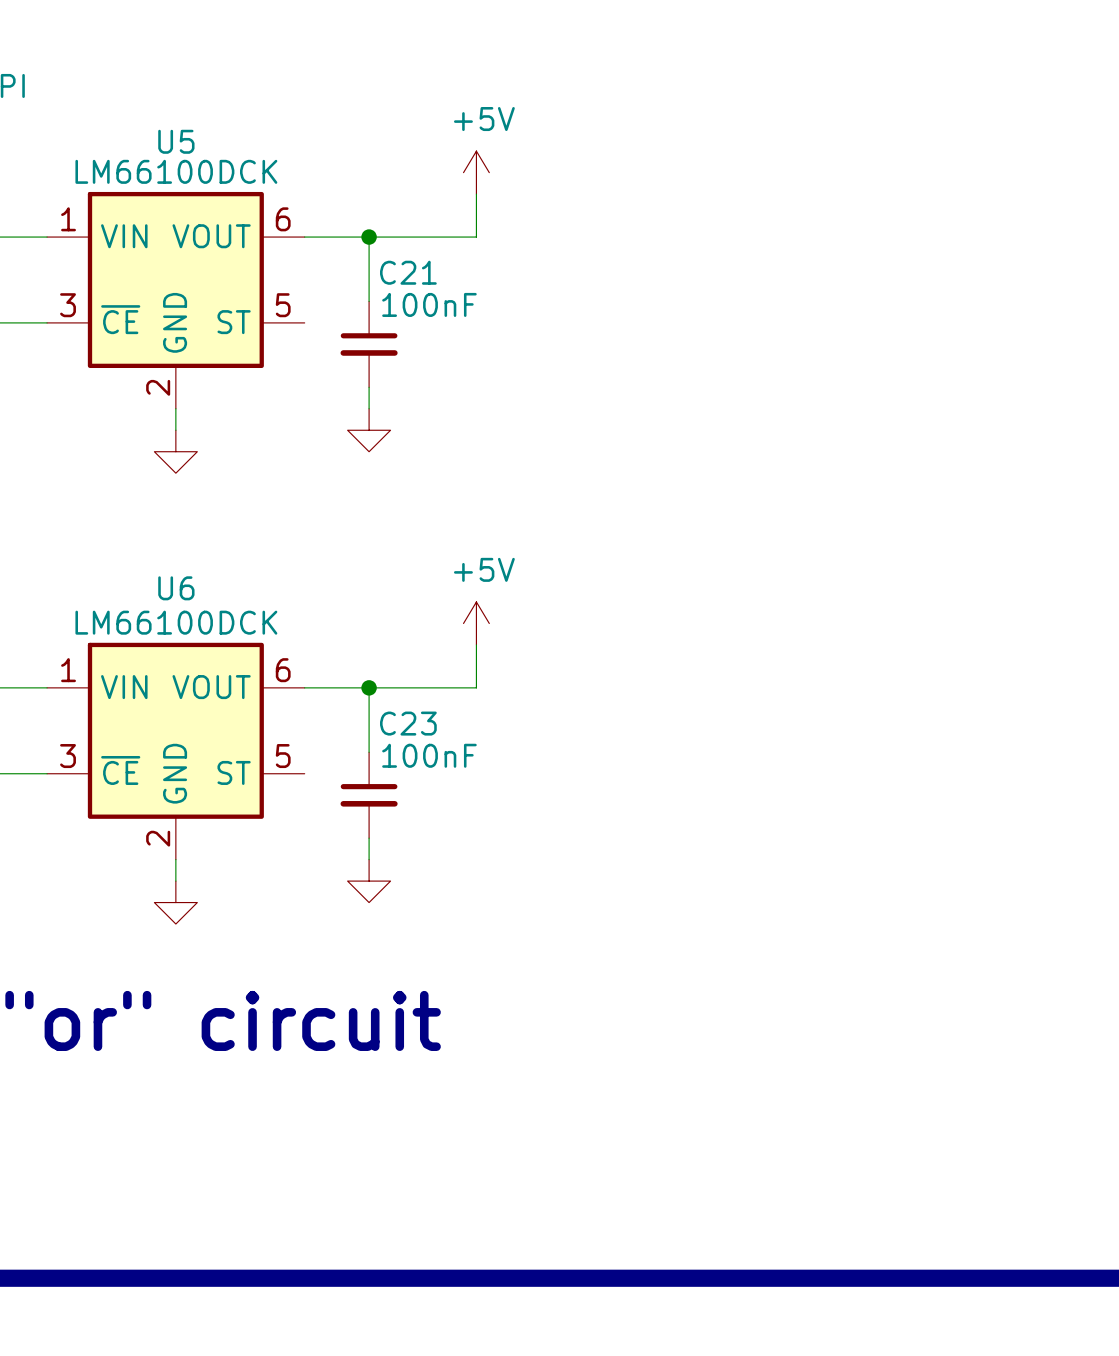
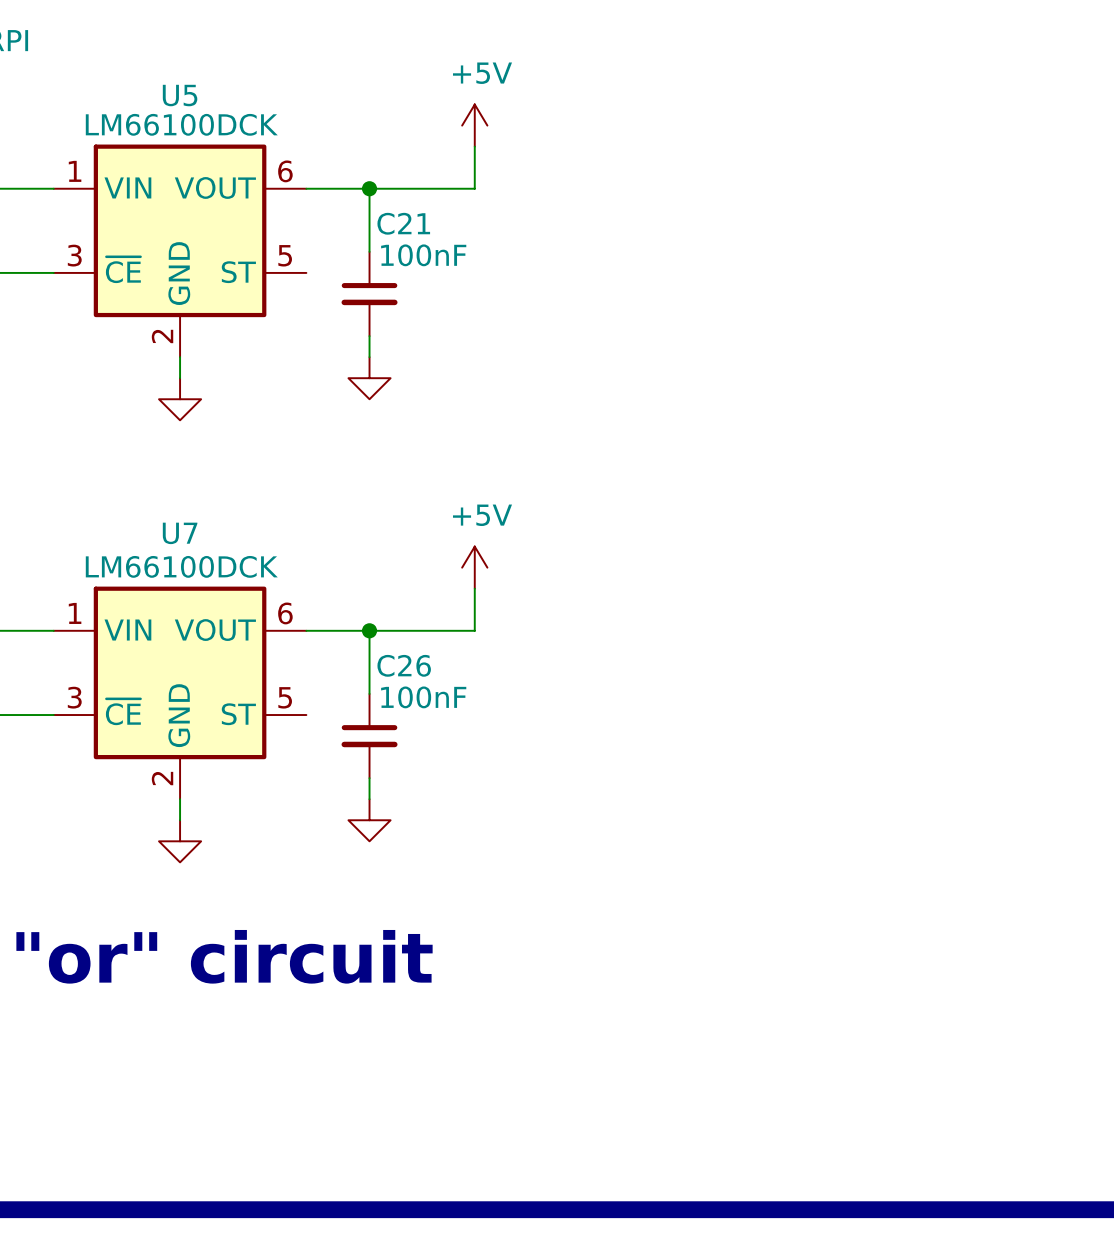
U6 name: U6 (176, 588) -> U7 (180, 533)
C23 name: C23 (408, 723) -> C26 (404, 665)

